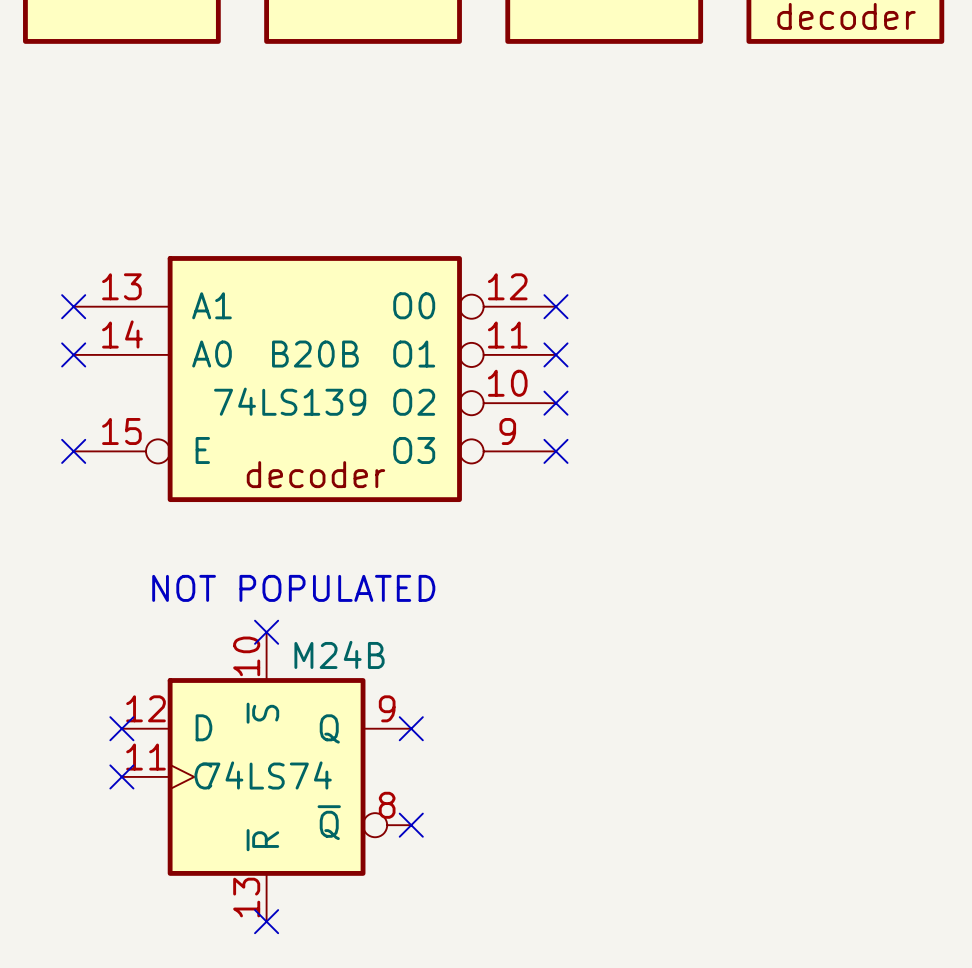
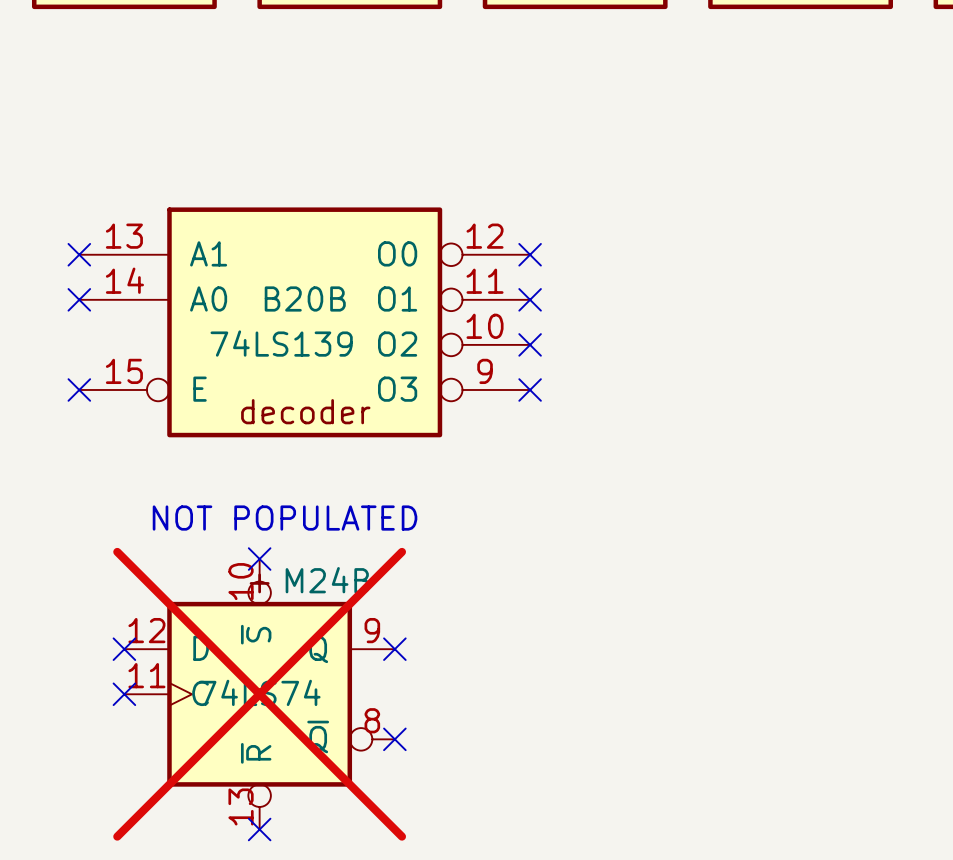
M24B symbol: [121, 632, 412, 922] -> [124, 559, 395, 830]
M24B do-not-place cross: none -> (259, 694)

